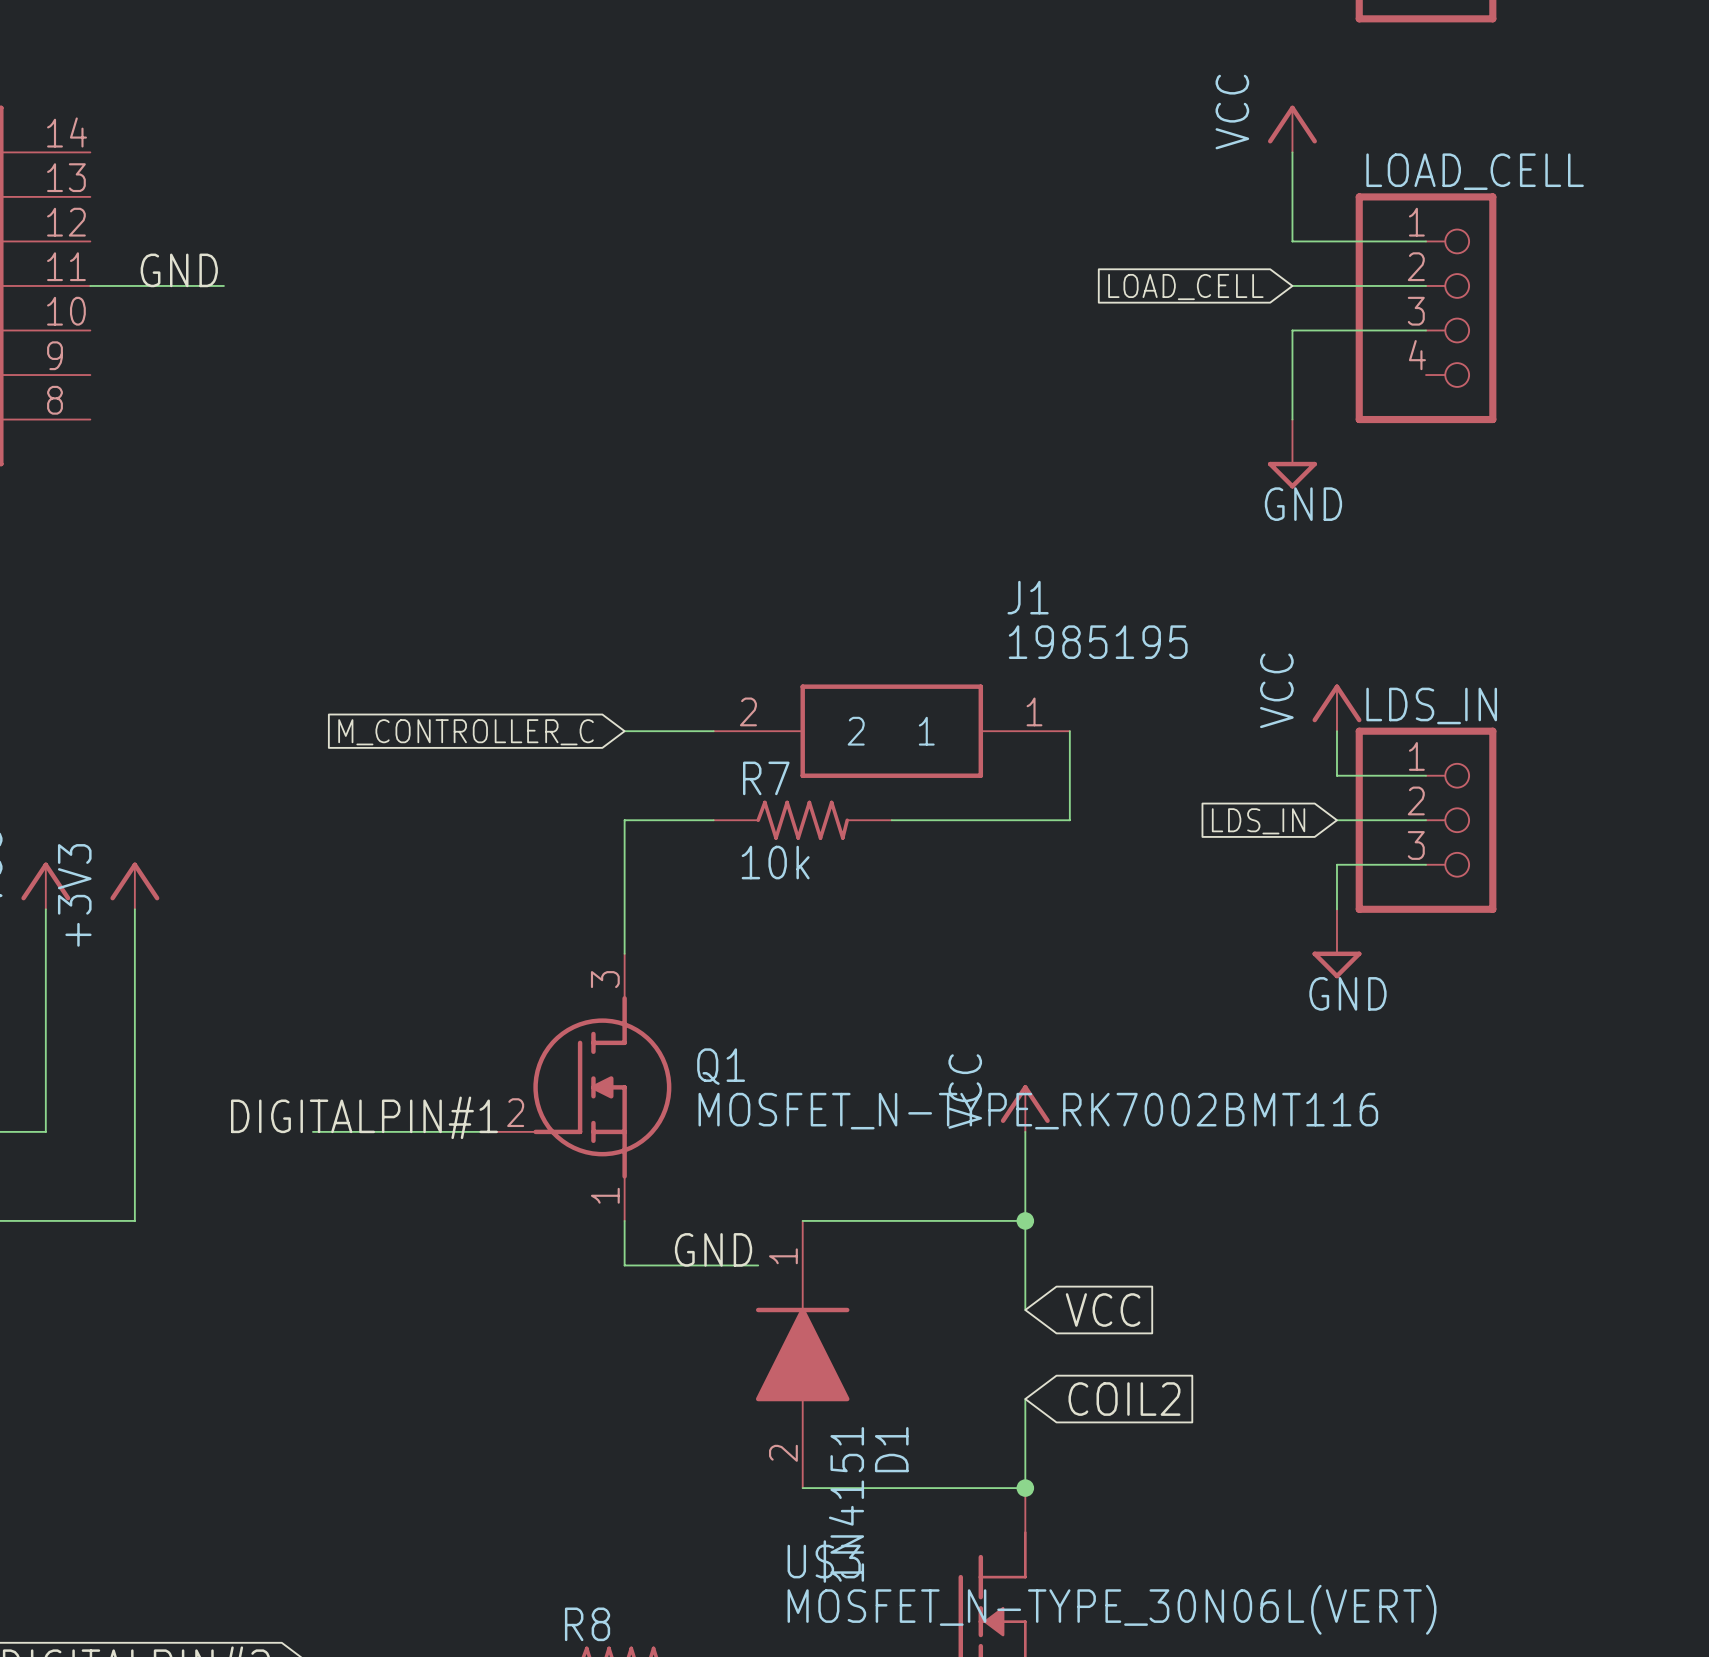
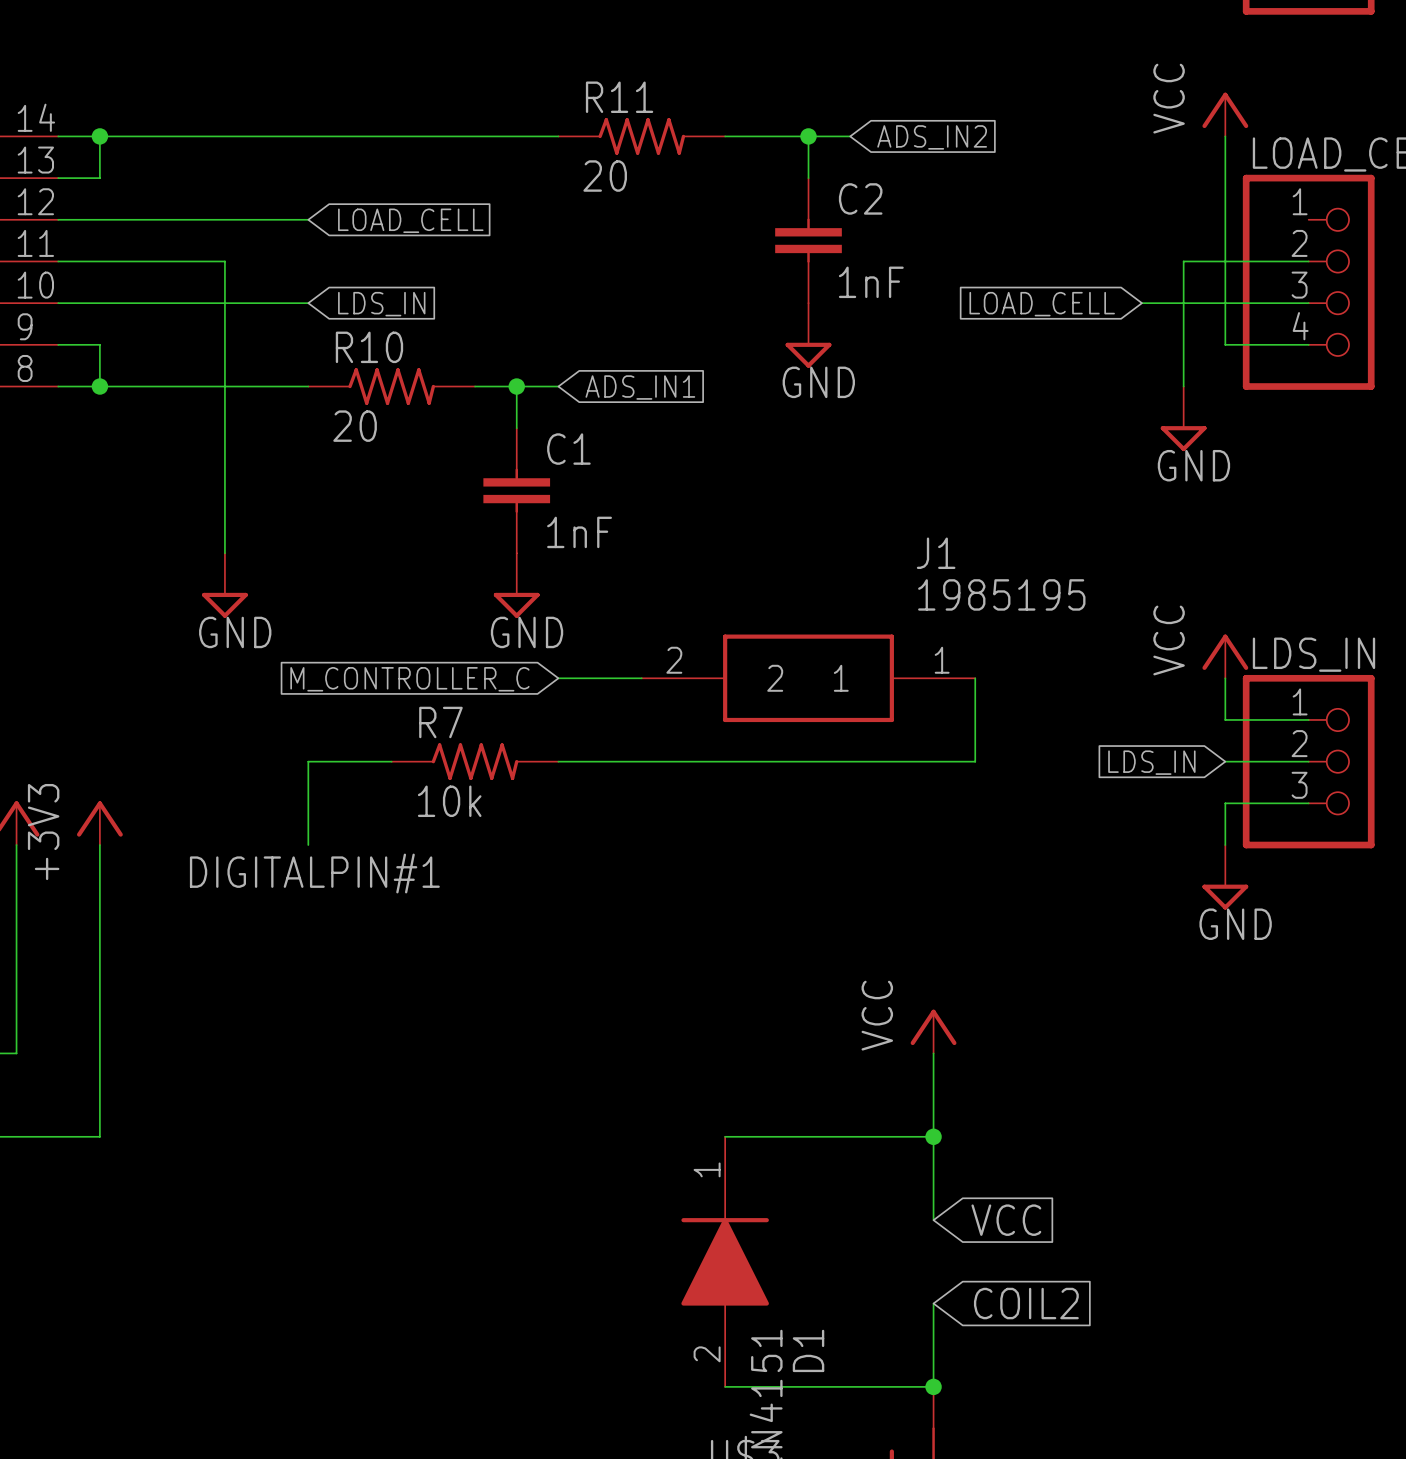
power symbol position: VCC (1292, 129) -> VCC (1225, 114)
wire: none -> (58, 136) (558, 136)
wire: none -> (99, 136) (99, 178) (58, 178)
junction: none -> (99, 136)
R11: none -> 20 (641, 136)
wire: none -> (725, 136) (850, 136)
wire: none -> (808, 136) (808, 178)
junction: none -> (808, 136)
wire: (1292, 152) (1292, 241) (1426, 241) -> none
wire: none -> (1225, 136) (1225, 344) (1308, 344)
global label: none -> ADS_IN2 (932, 137)
wire: none -> (58, 219) (308, 219)
global label: none -> LOAD_CELL (410, 220)
C2: none -> 1nF (808, 240)
label: GND (179, 270) -> none
wire: none -> (183, 261) (224, 261) (224, 553)
wire: none -> (1183, 261) (1183, 303) (1141, 303)
global label position: LOAD_CELL (1185, 287) -> LOAD_CELL (1042, 304)
wire: none -> (58, 303) (308, 303)
global label: none -> LDS_IN (381, 304)
power symbol: none -> GND (808, 335)
wire: none -> (58, 344) (99, 344) (99, 386)
wire: none -> (58, 386) (308, 386)
junction: none -> (99, 386)
R10: none -> 20 (391, 386)
wire: none -> (475, 386) (558, 386)
wire: none -> (516, 386) (516, 428)
junction: none -> (516, 386)
global label: none -> ADS_IN1 (640, 387)
C1: none -> 1nF (516, 490)
power symbol: none -> GND (224, 585)
power symbol: none -> GND (516, 585)
wire: none -> (391, 761) (308, 761) (308, 845)
wire: (624, 820) (624, 953) -> none
R7 position: (802, 820) -> (475, 761)
Q1: MOSFET_N-TYPE_RK7002BMT116 (581, 1087) -> none
label position: DIGITALPIN#1 (364, 1117) -> DIGITALPIN#1 (314, 873)
wire: (312, 1131) (491, 1131) -> none
wire: (624, 1220) (624, 1265) (758, 1265) -> none
label: GND (713, 1249) -> none

